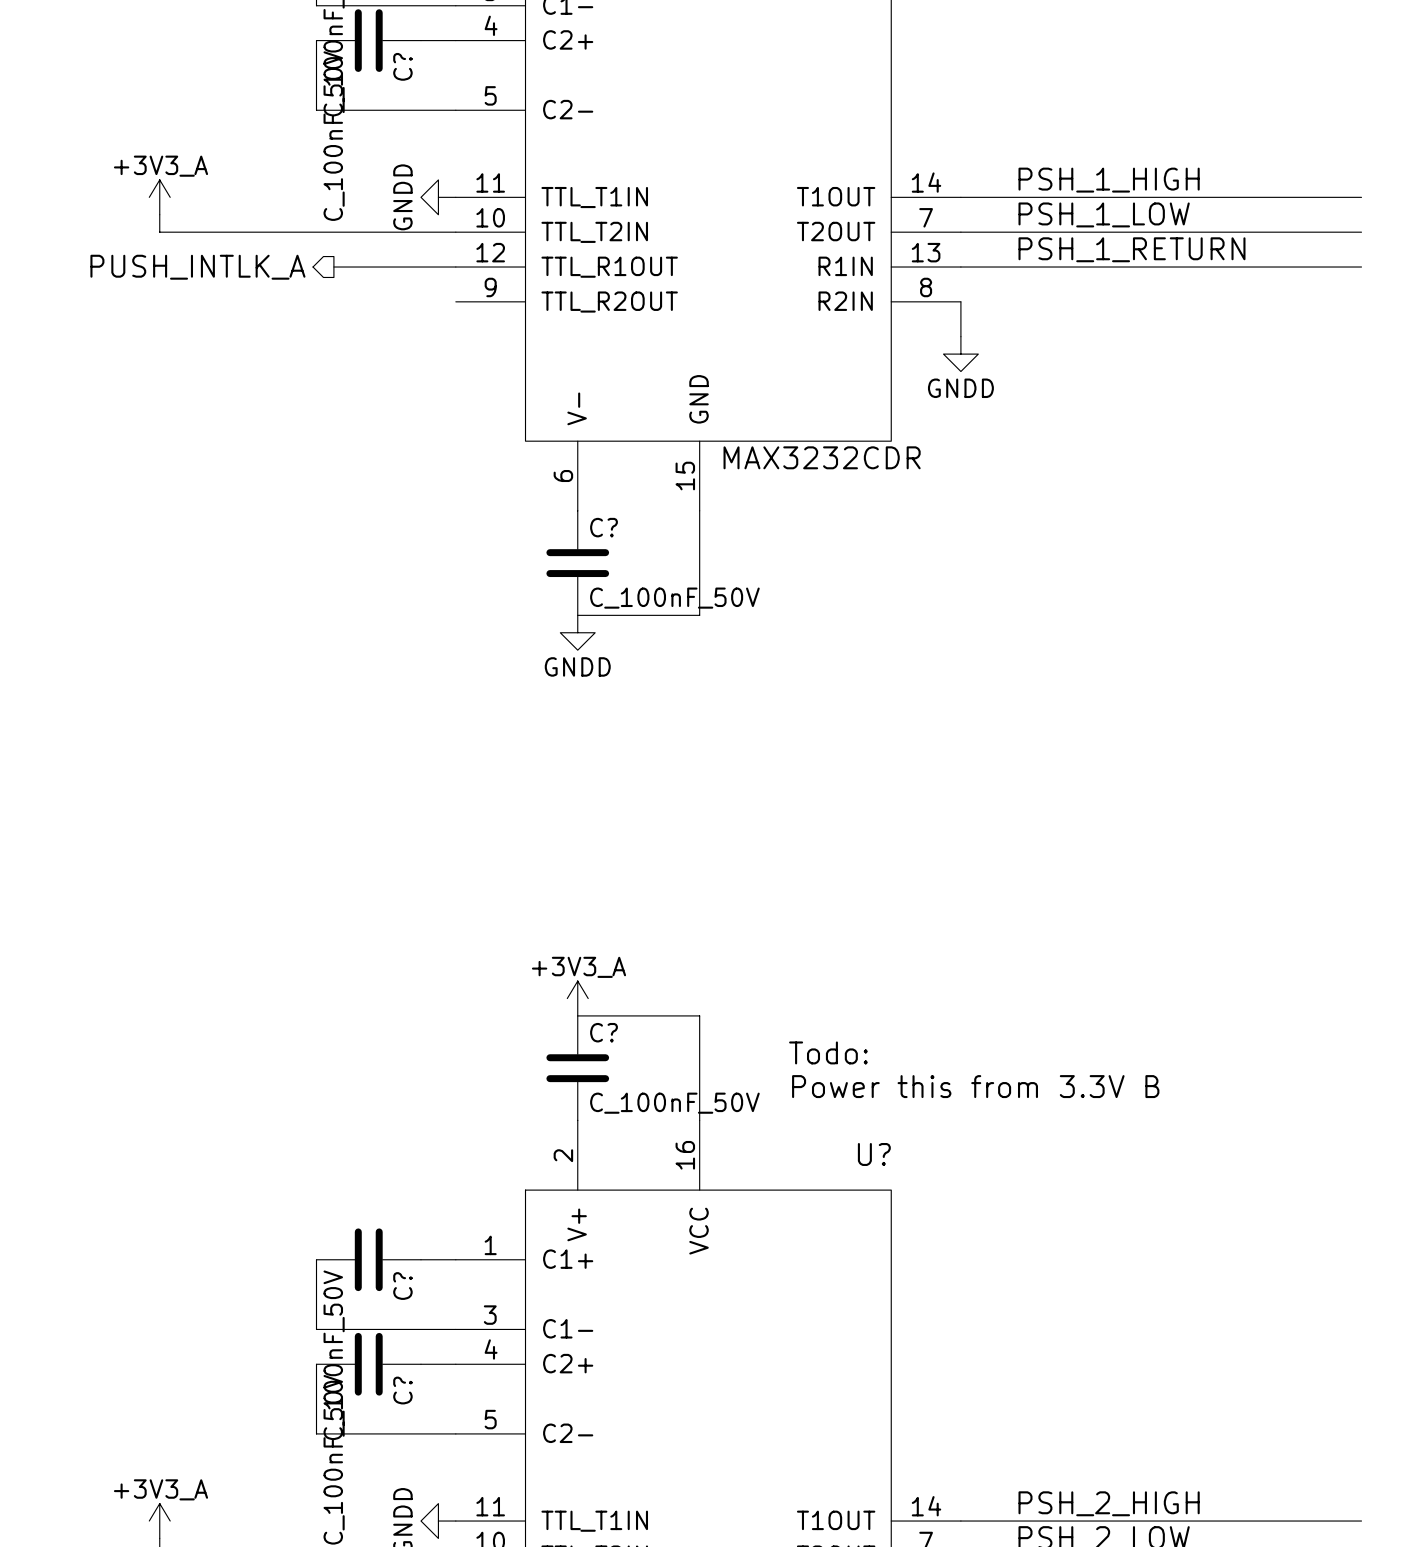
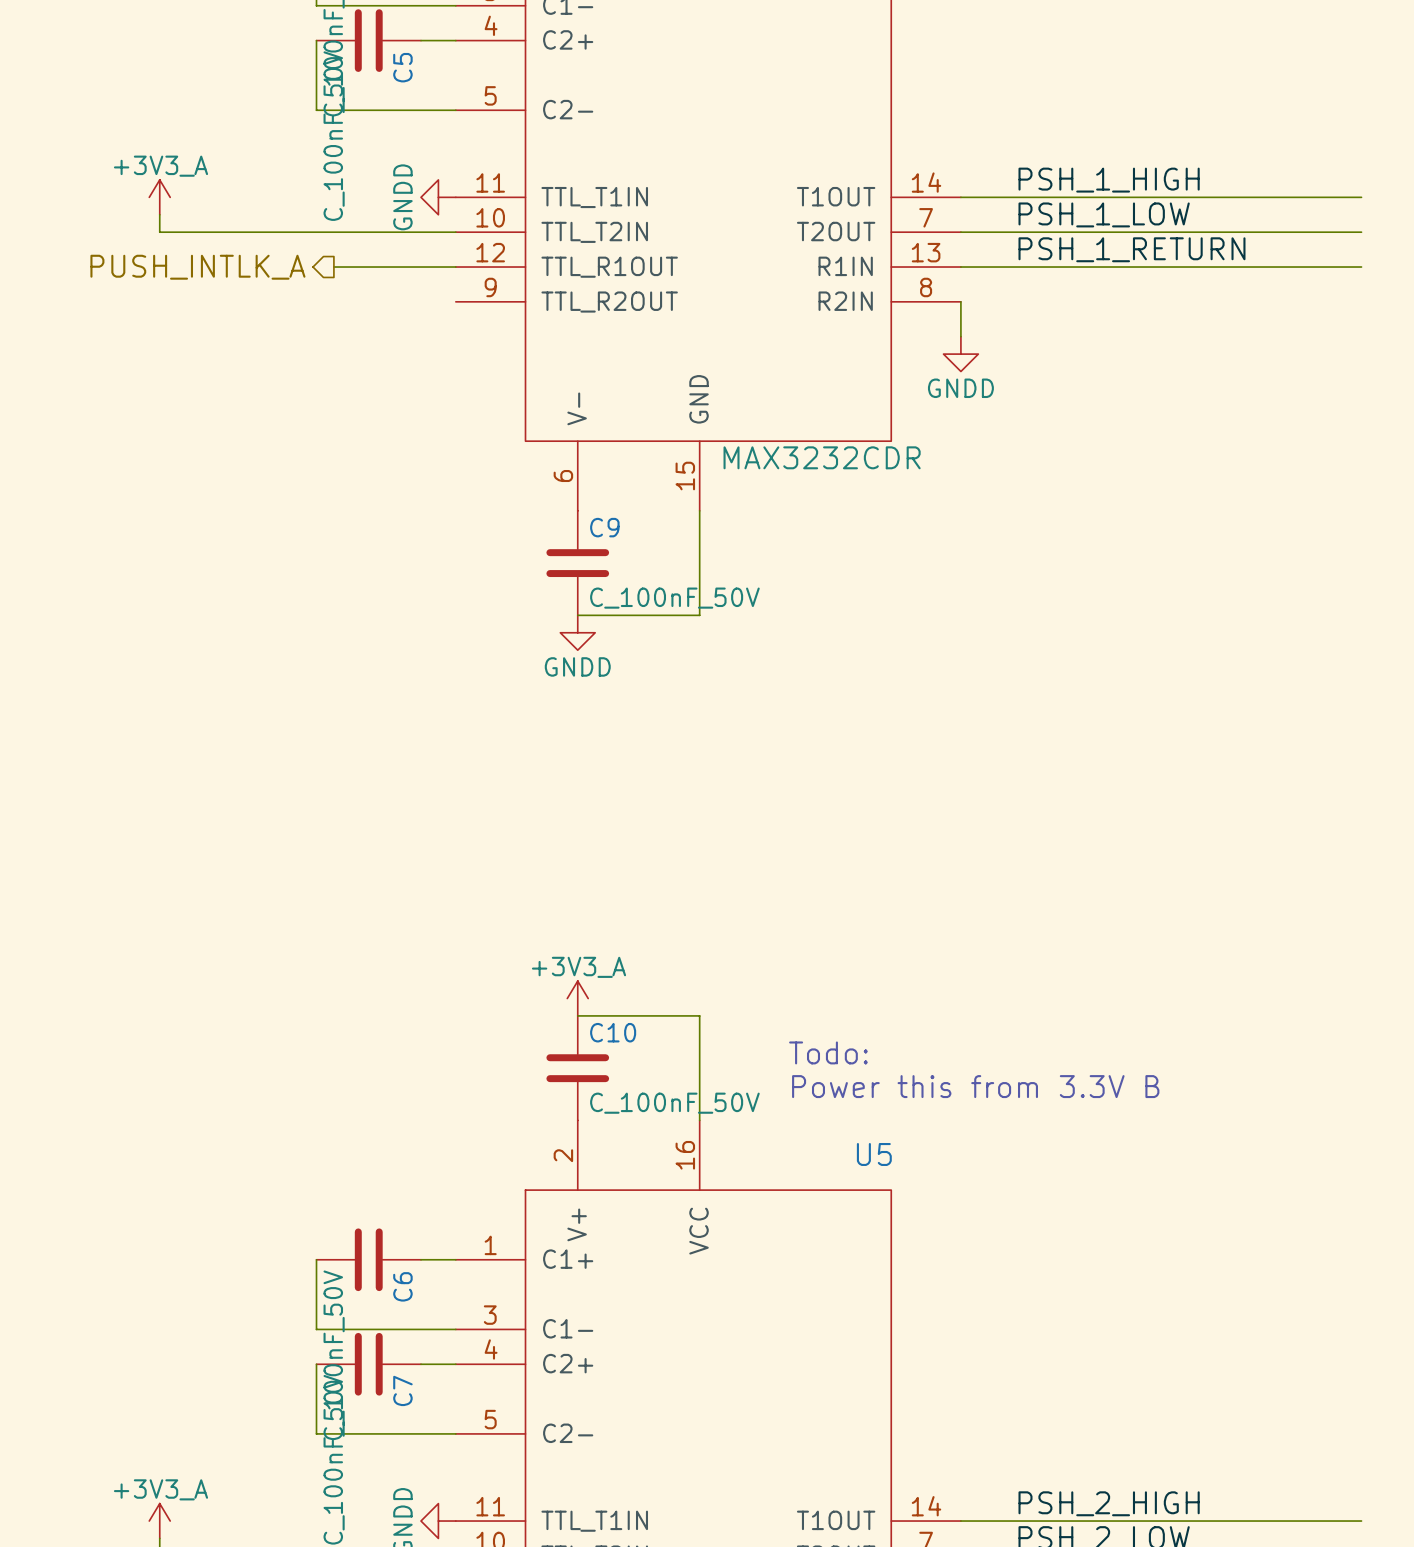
C? name: C? (402, 66) -> C5 (402, 67)
C? name: C? (604, 527) -> C9 (604, 527)
C? name: C? (604, 1032) -> C10 (613, 1032)
U? name: U? (874, 1154) -> U5 (874, 1154)
C? name: C? (402, 1286) -> C6 (402, 1286)
C? name: C? (402, 1390) -> C7 (402, 1390)

